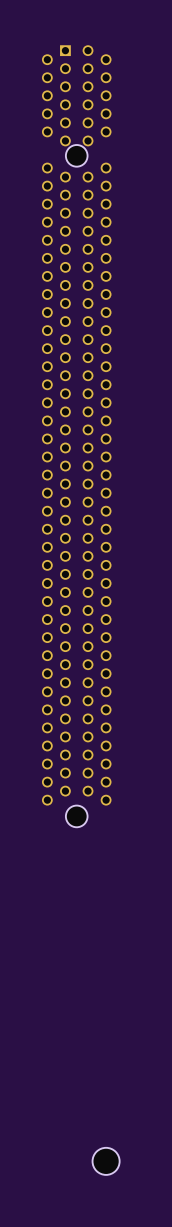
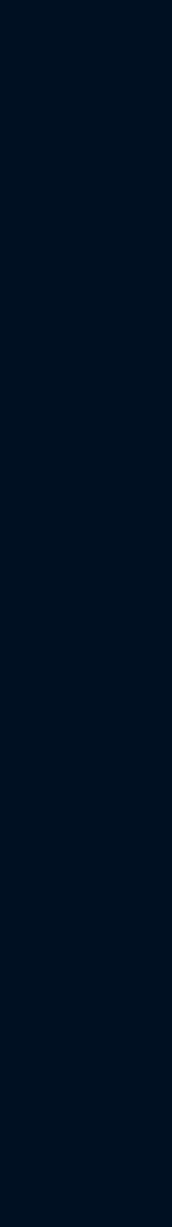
part: (76, 436) -> none
part: (106, 1161) -> none

